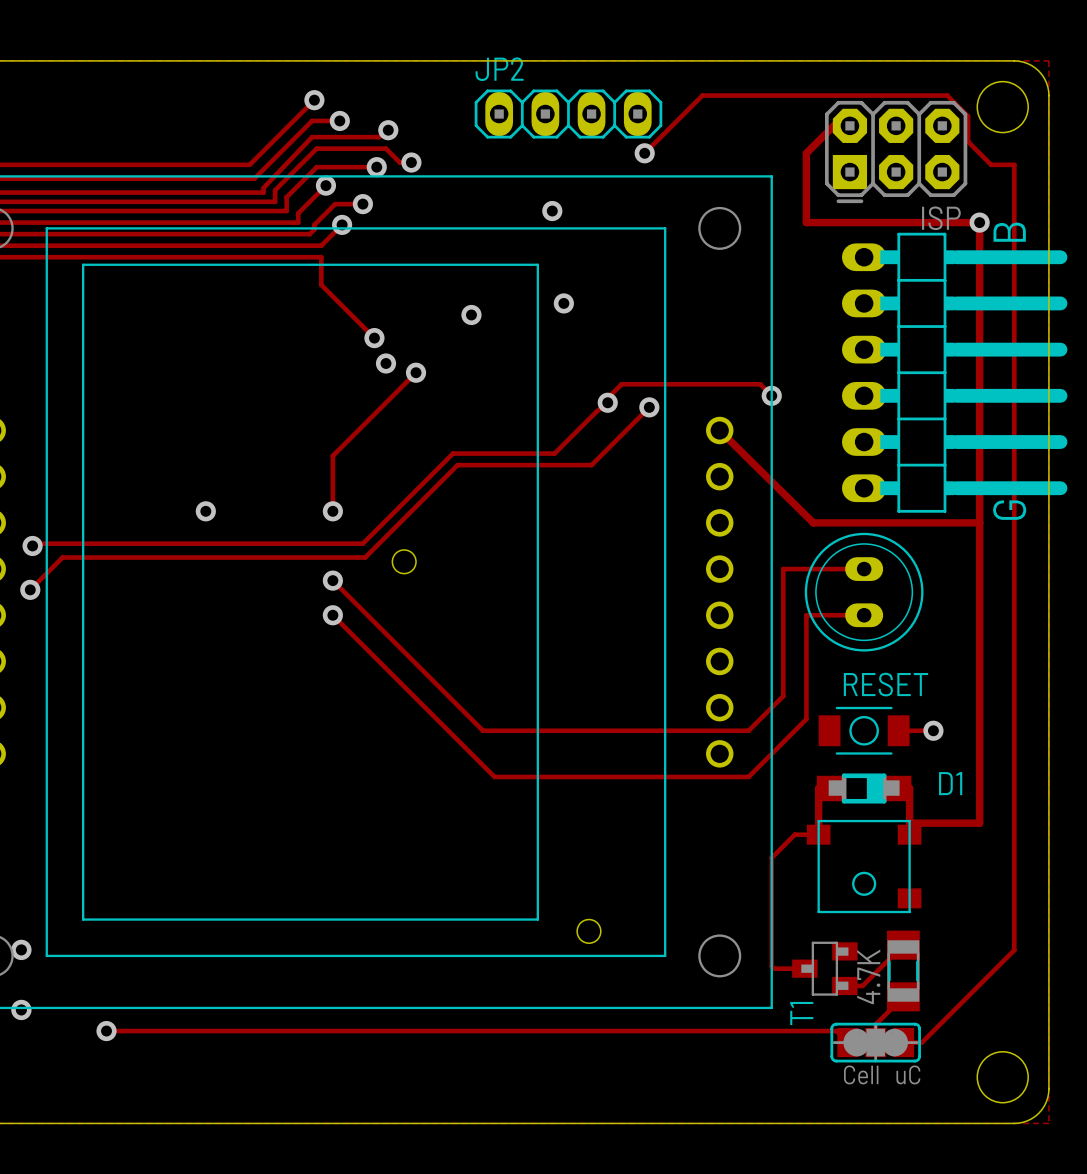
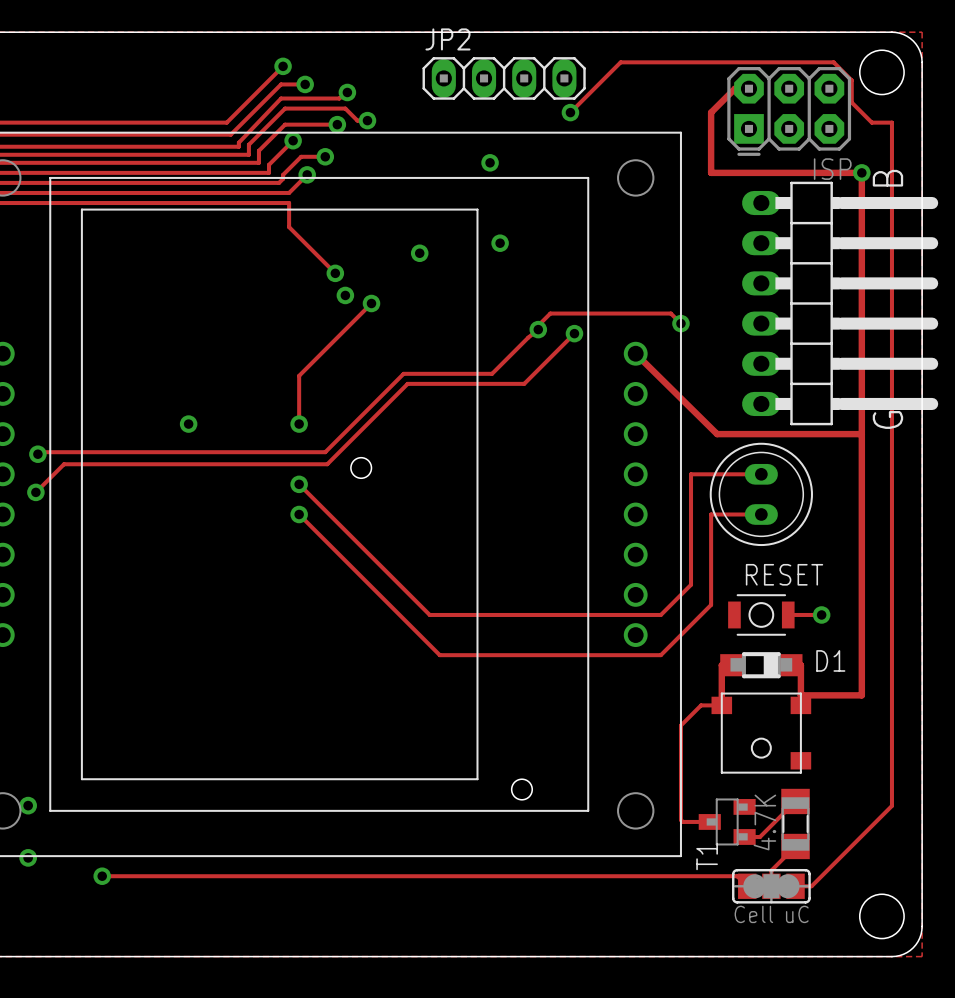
RESET footprint: [818, 706, 910, 755] -> [728, 594, 795, 636]

